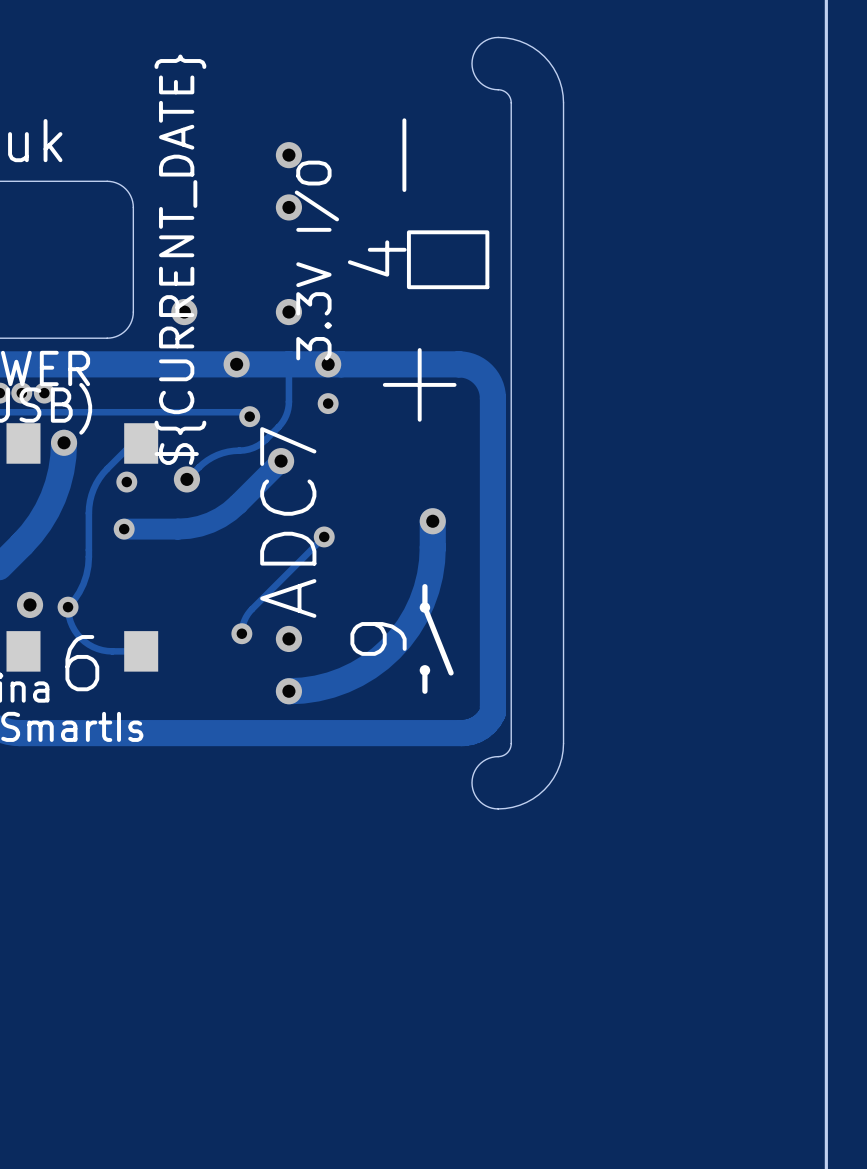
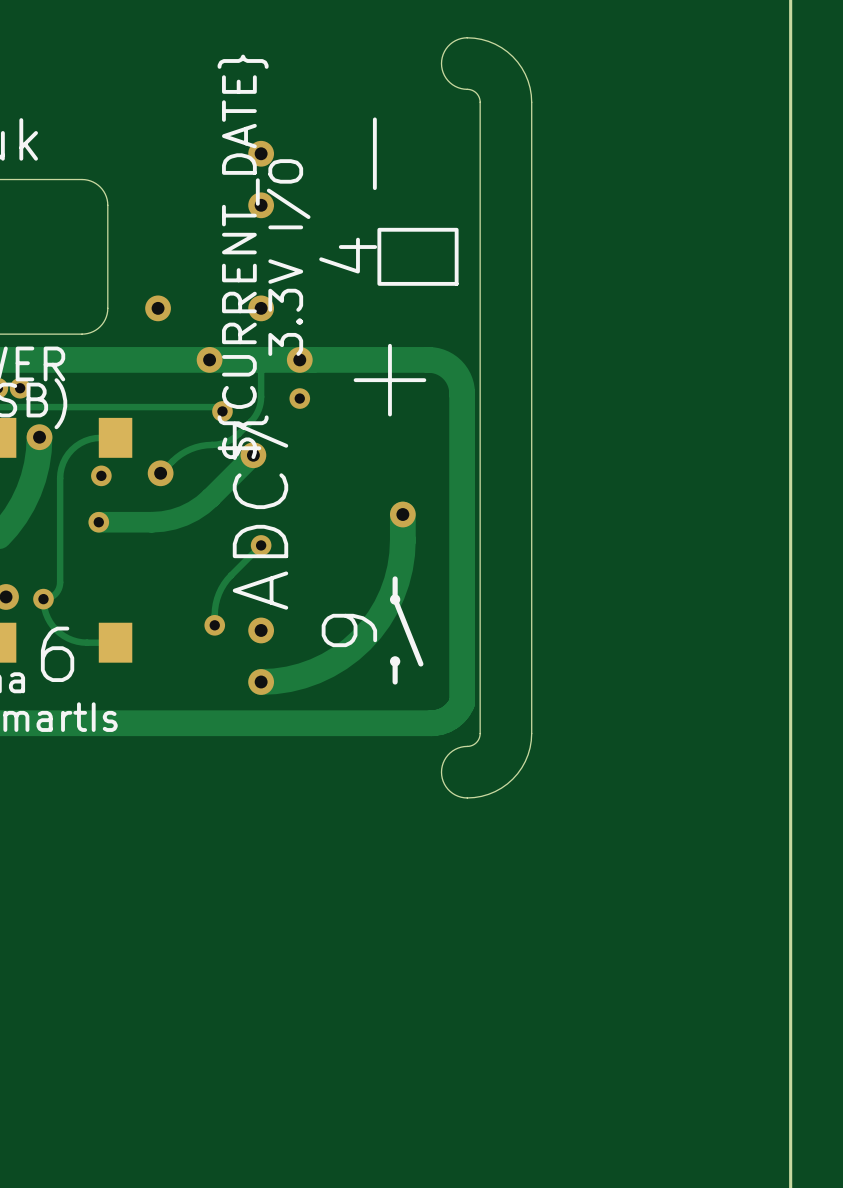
text position: ${CURRENT_DATE} (180, 259) -> ${CURRENT_DATE} (243, 256)
track: (141, 443) (133, 445) (126, 449) (103, 473) (93, 489) (89, 507) (88, 556) (86, 575) (79, 592) (68, 607) -> (115, 437) (95, 438) (85, 440) (72, 449) (63, 462) (60, 478) (59, 584) (55, 594) (43, 599)
track: (324, 536) (249, 611) (244, 620) (241, 633) -> (261, 545) (231, 575) (221, 588) (215, 604) (214, 625)
via position: (324, 536) -> (261, 545)

